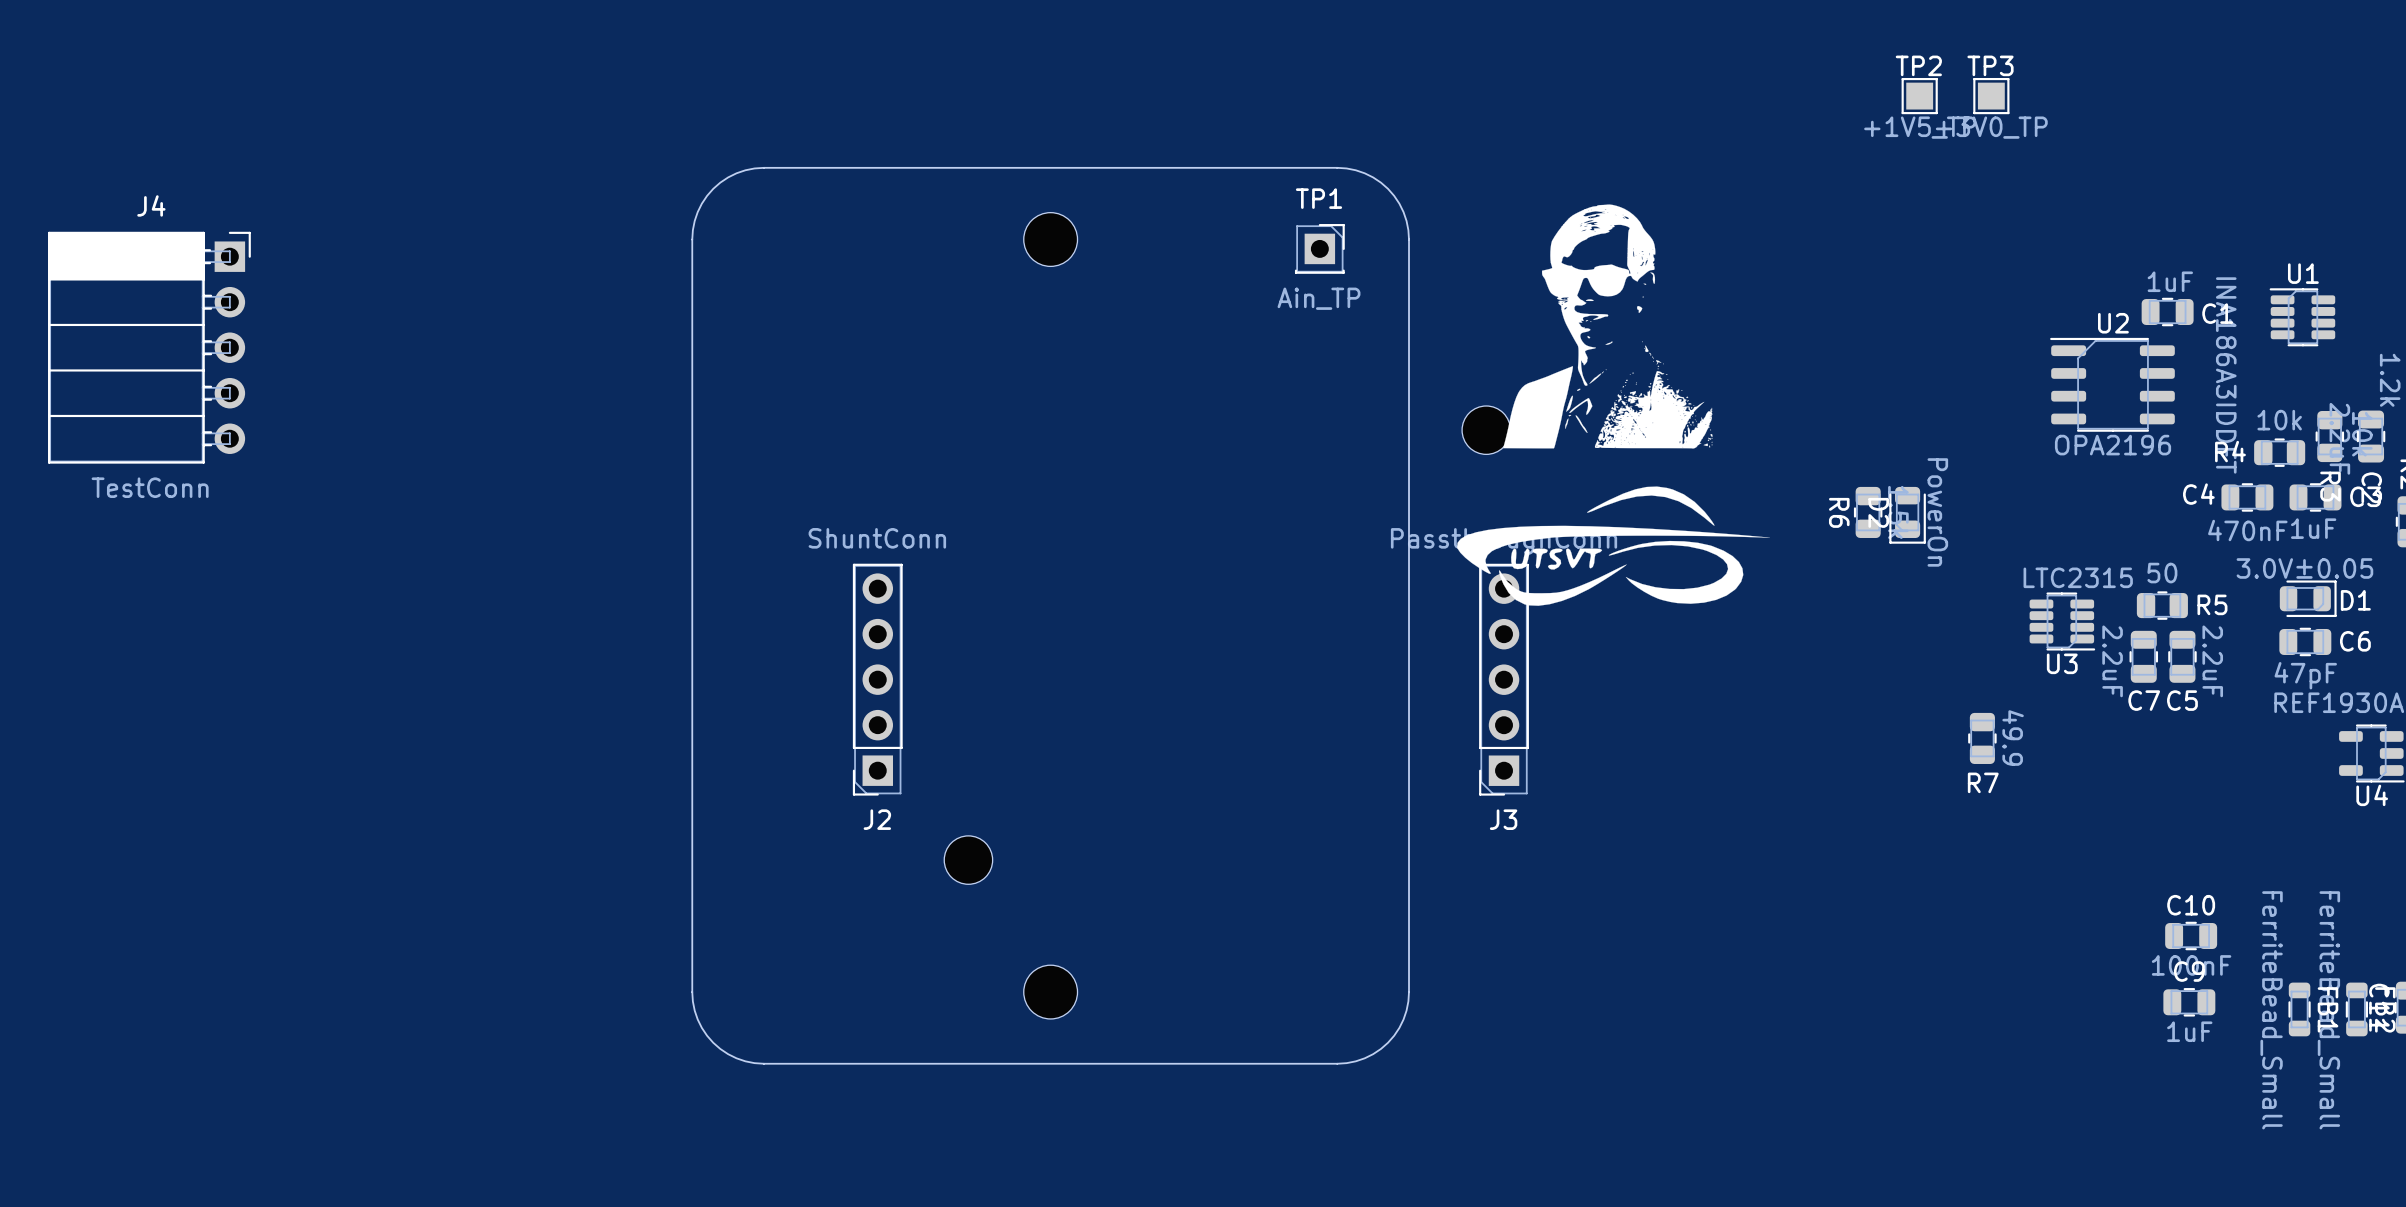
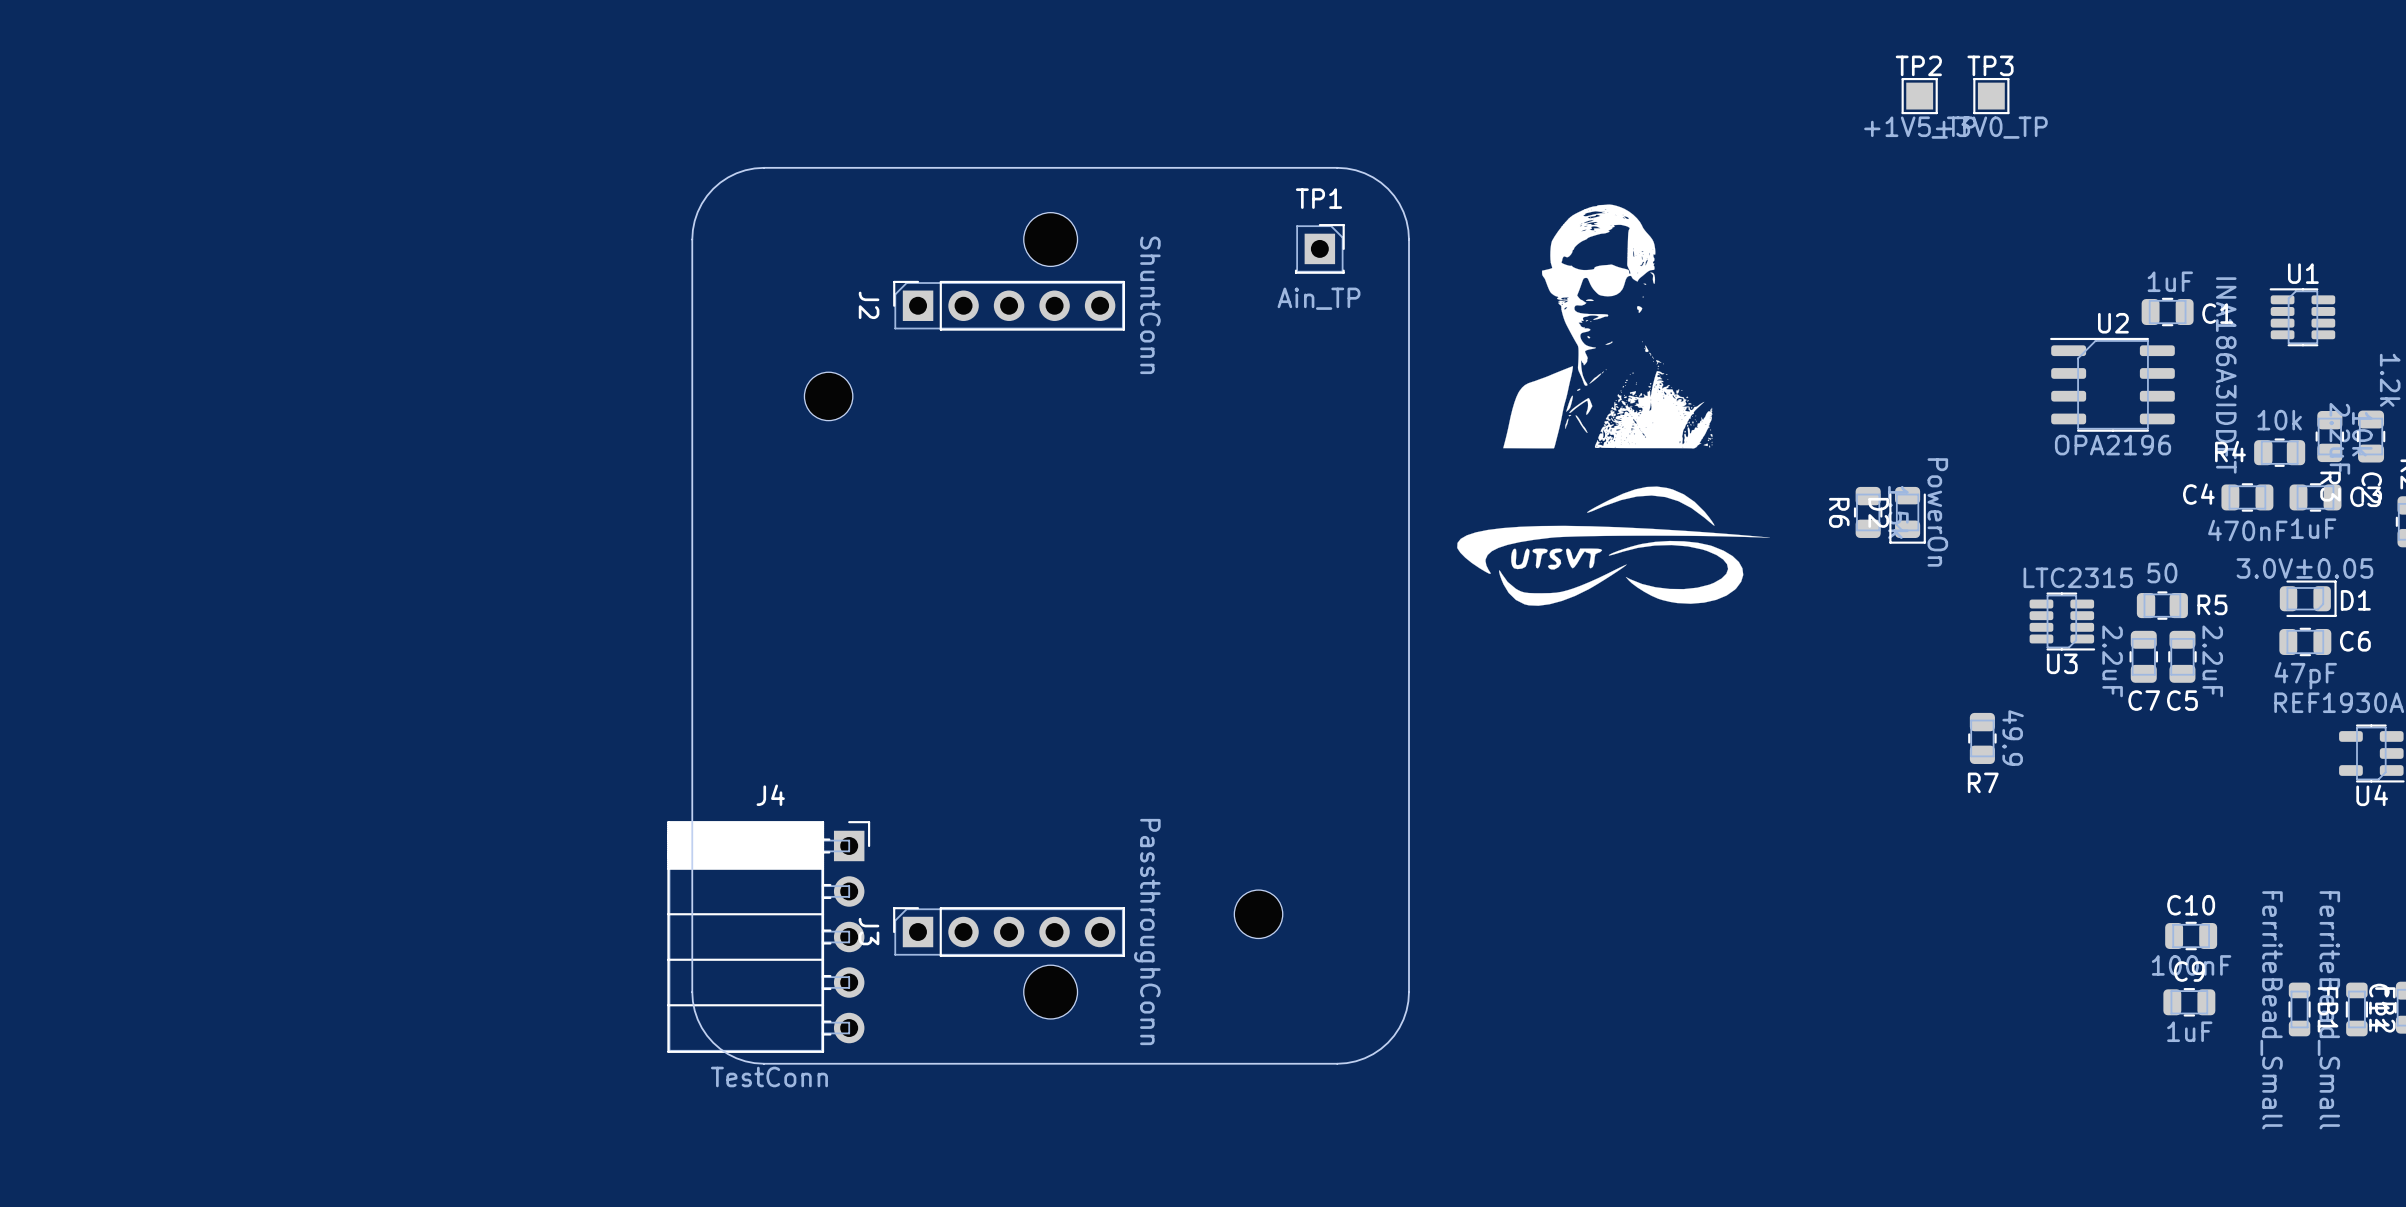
J4 position: (149, 347) -> (768, 937)
part: none -> (828, 396)
part: (1486, 430) -> none
J2 rotation: 0° (877, 679) -> 90° clockwise (1009, 305)
J2 position: (877, 679) -> (1009, 305)
J3 rotation: 0° (1504, 679) -> 90° clockwise (1009, 932)
J3 position: (1504, 679) -> (1009, 932)
part: (968, 860) -> none
part: none -> (1258, 914)

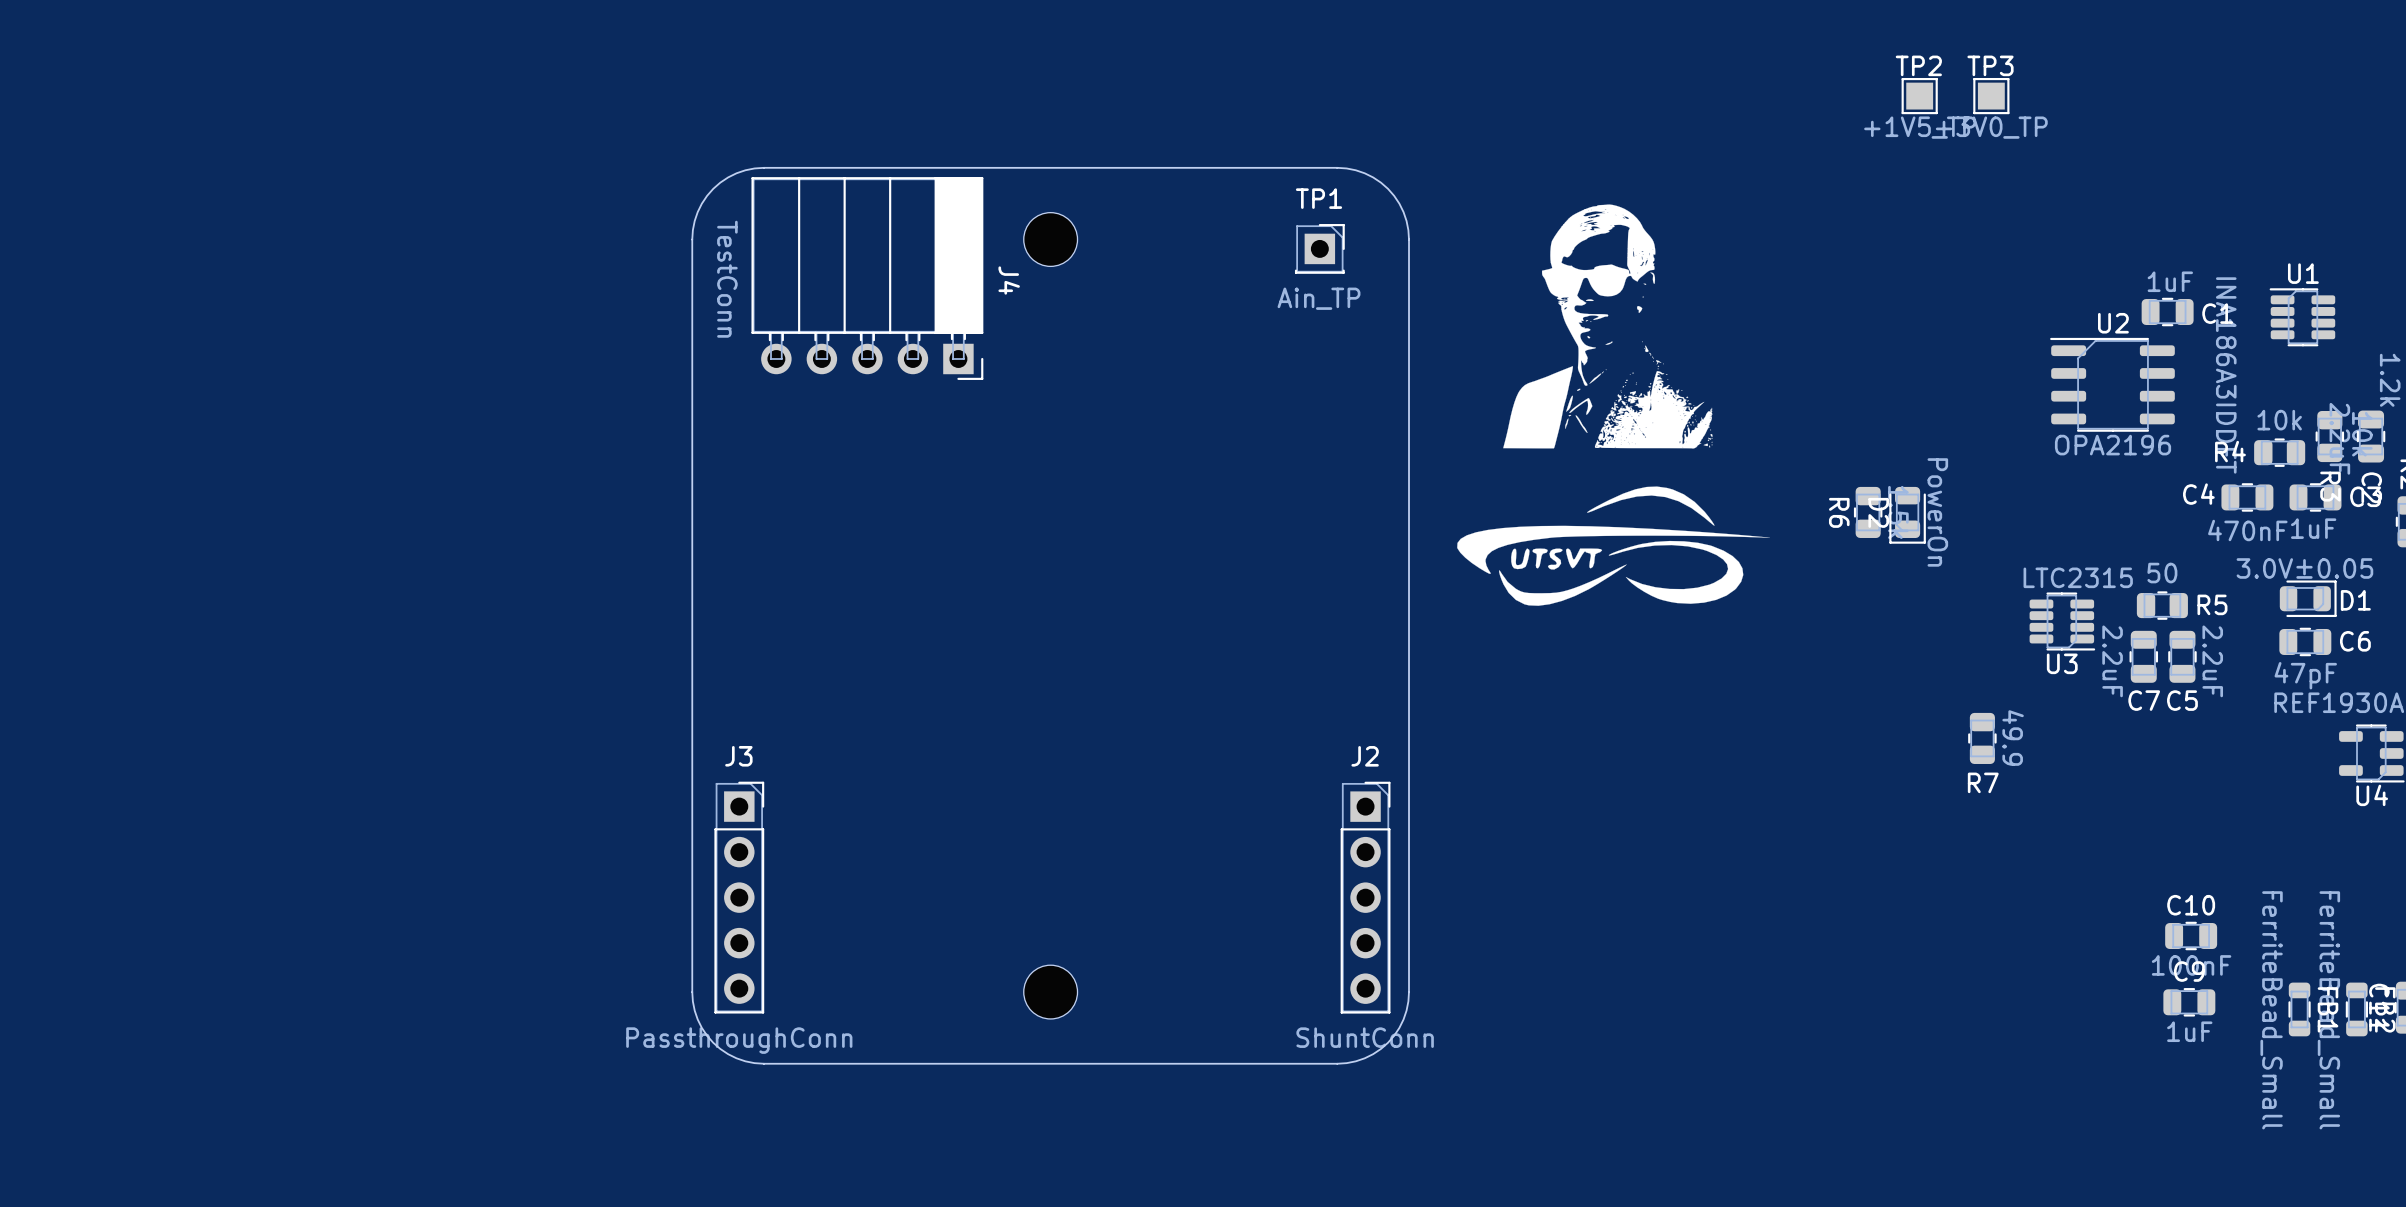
J2 rotation: 0° (1009, 305) -> 90° clockwise (1365, 897)
J2 position: (1009, 305) -> (1365, 897)
part: (828, 396) -> none
part: (1258, 914) -> none
J3 rotation: 0° (1009, 932) -> 90° clockwise (739, 897)
J3 position: (1009, 932) -> (739, 897)
J4 rotation: 0° (768, 937) -> 90° clockwise (867, 278)
J4 position: (768, 937) -> (867, 278)

